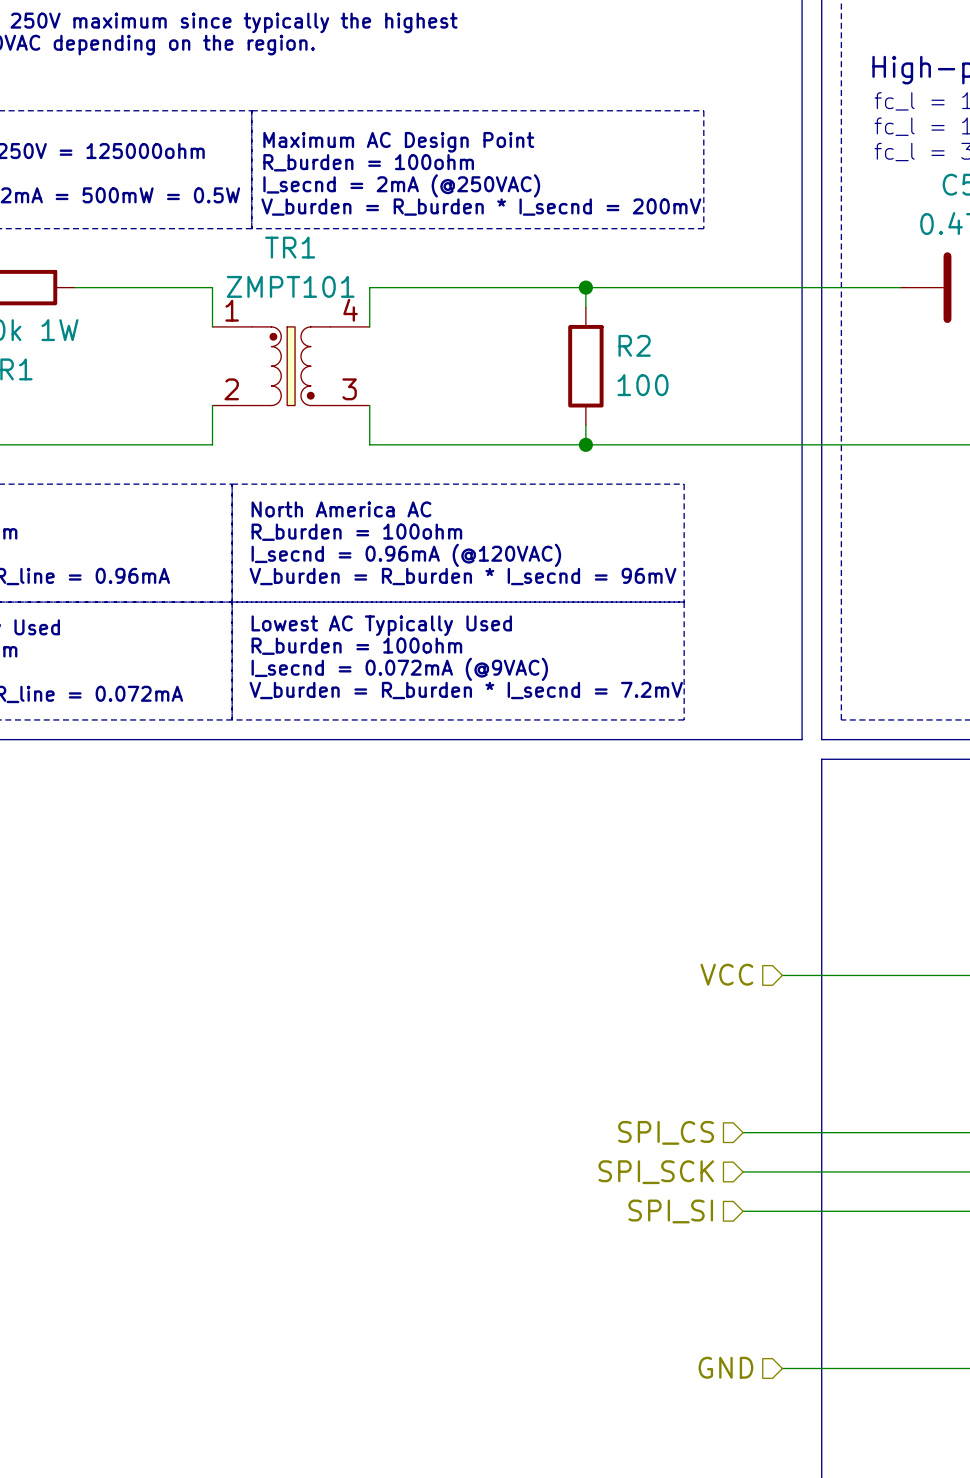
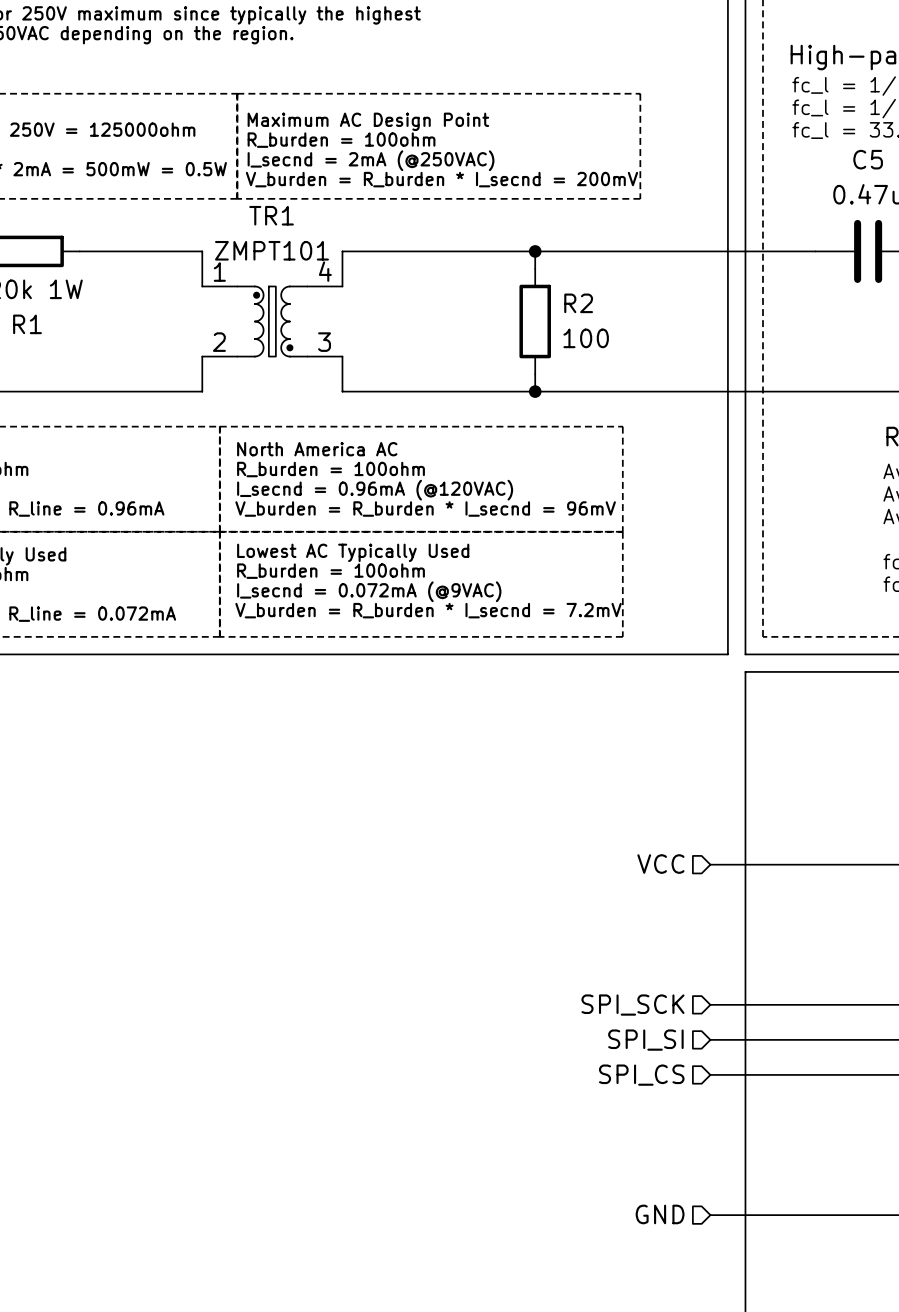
hierarchical label position: SPI_CS (666, 1132) -> SPI_CS (641, 1075)
wire: (743, 1132) (782, 1132) -> none
wire: (743, 1171) (782, 1171) -> none
hierarchical label position: SPI_SCK (656, 1172) -> SPI_SCK (632, 1005)
hierarchical label position: SPI_SI (670, 1211) -> SPI_SI (645, 1040)
wire: (743, 1211) (782, 1211) -> none

